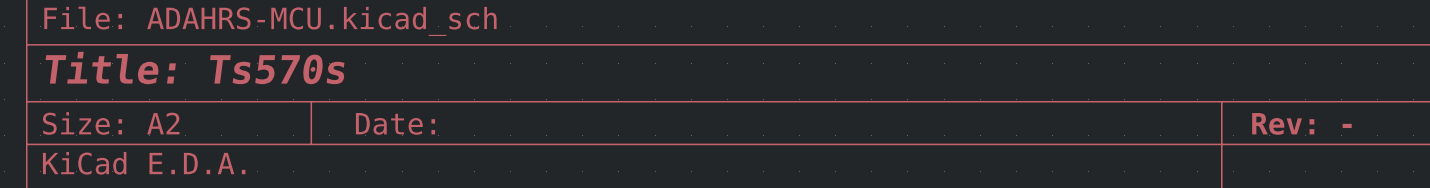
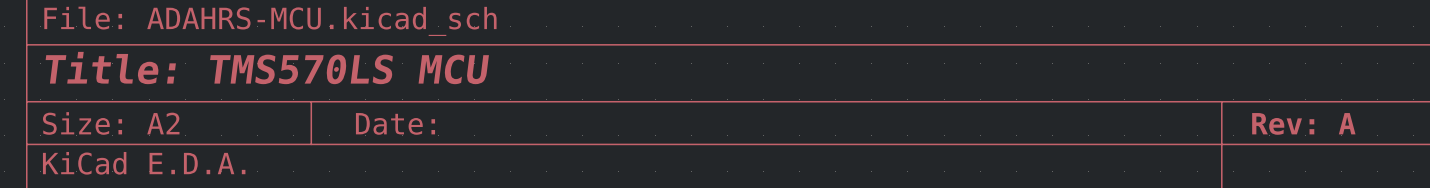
title block: Title: Ts570s (195, 68) -> Title: TMS570LS MCU (267, 68)
title block: Rev: - (1301, 123) -> Rev: A (1303, 123)

